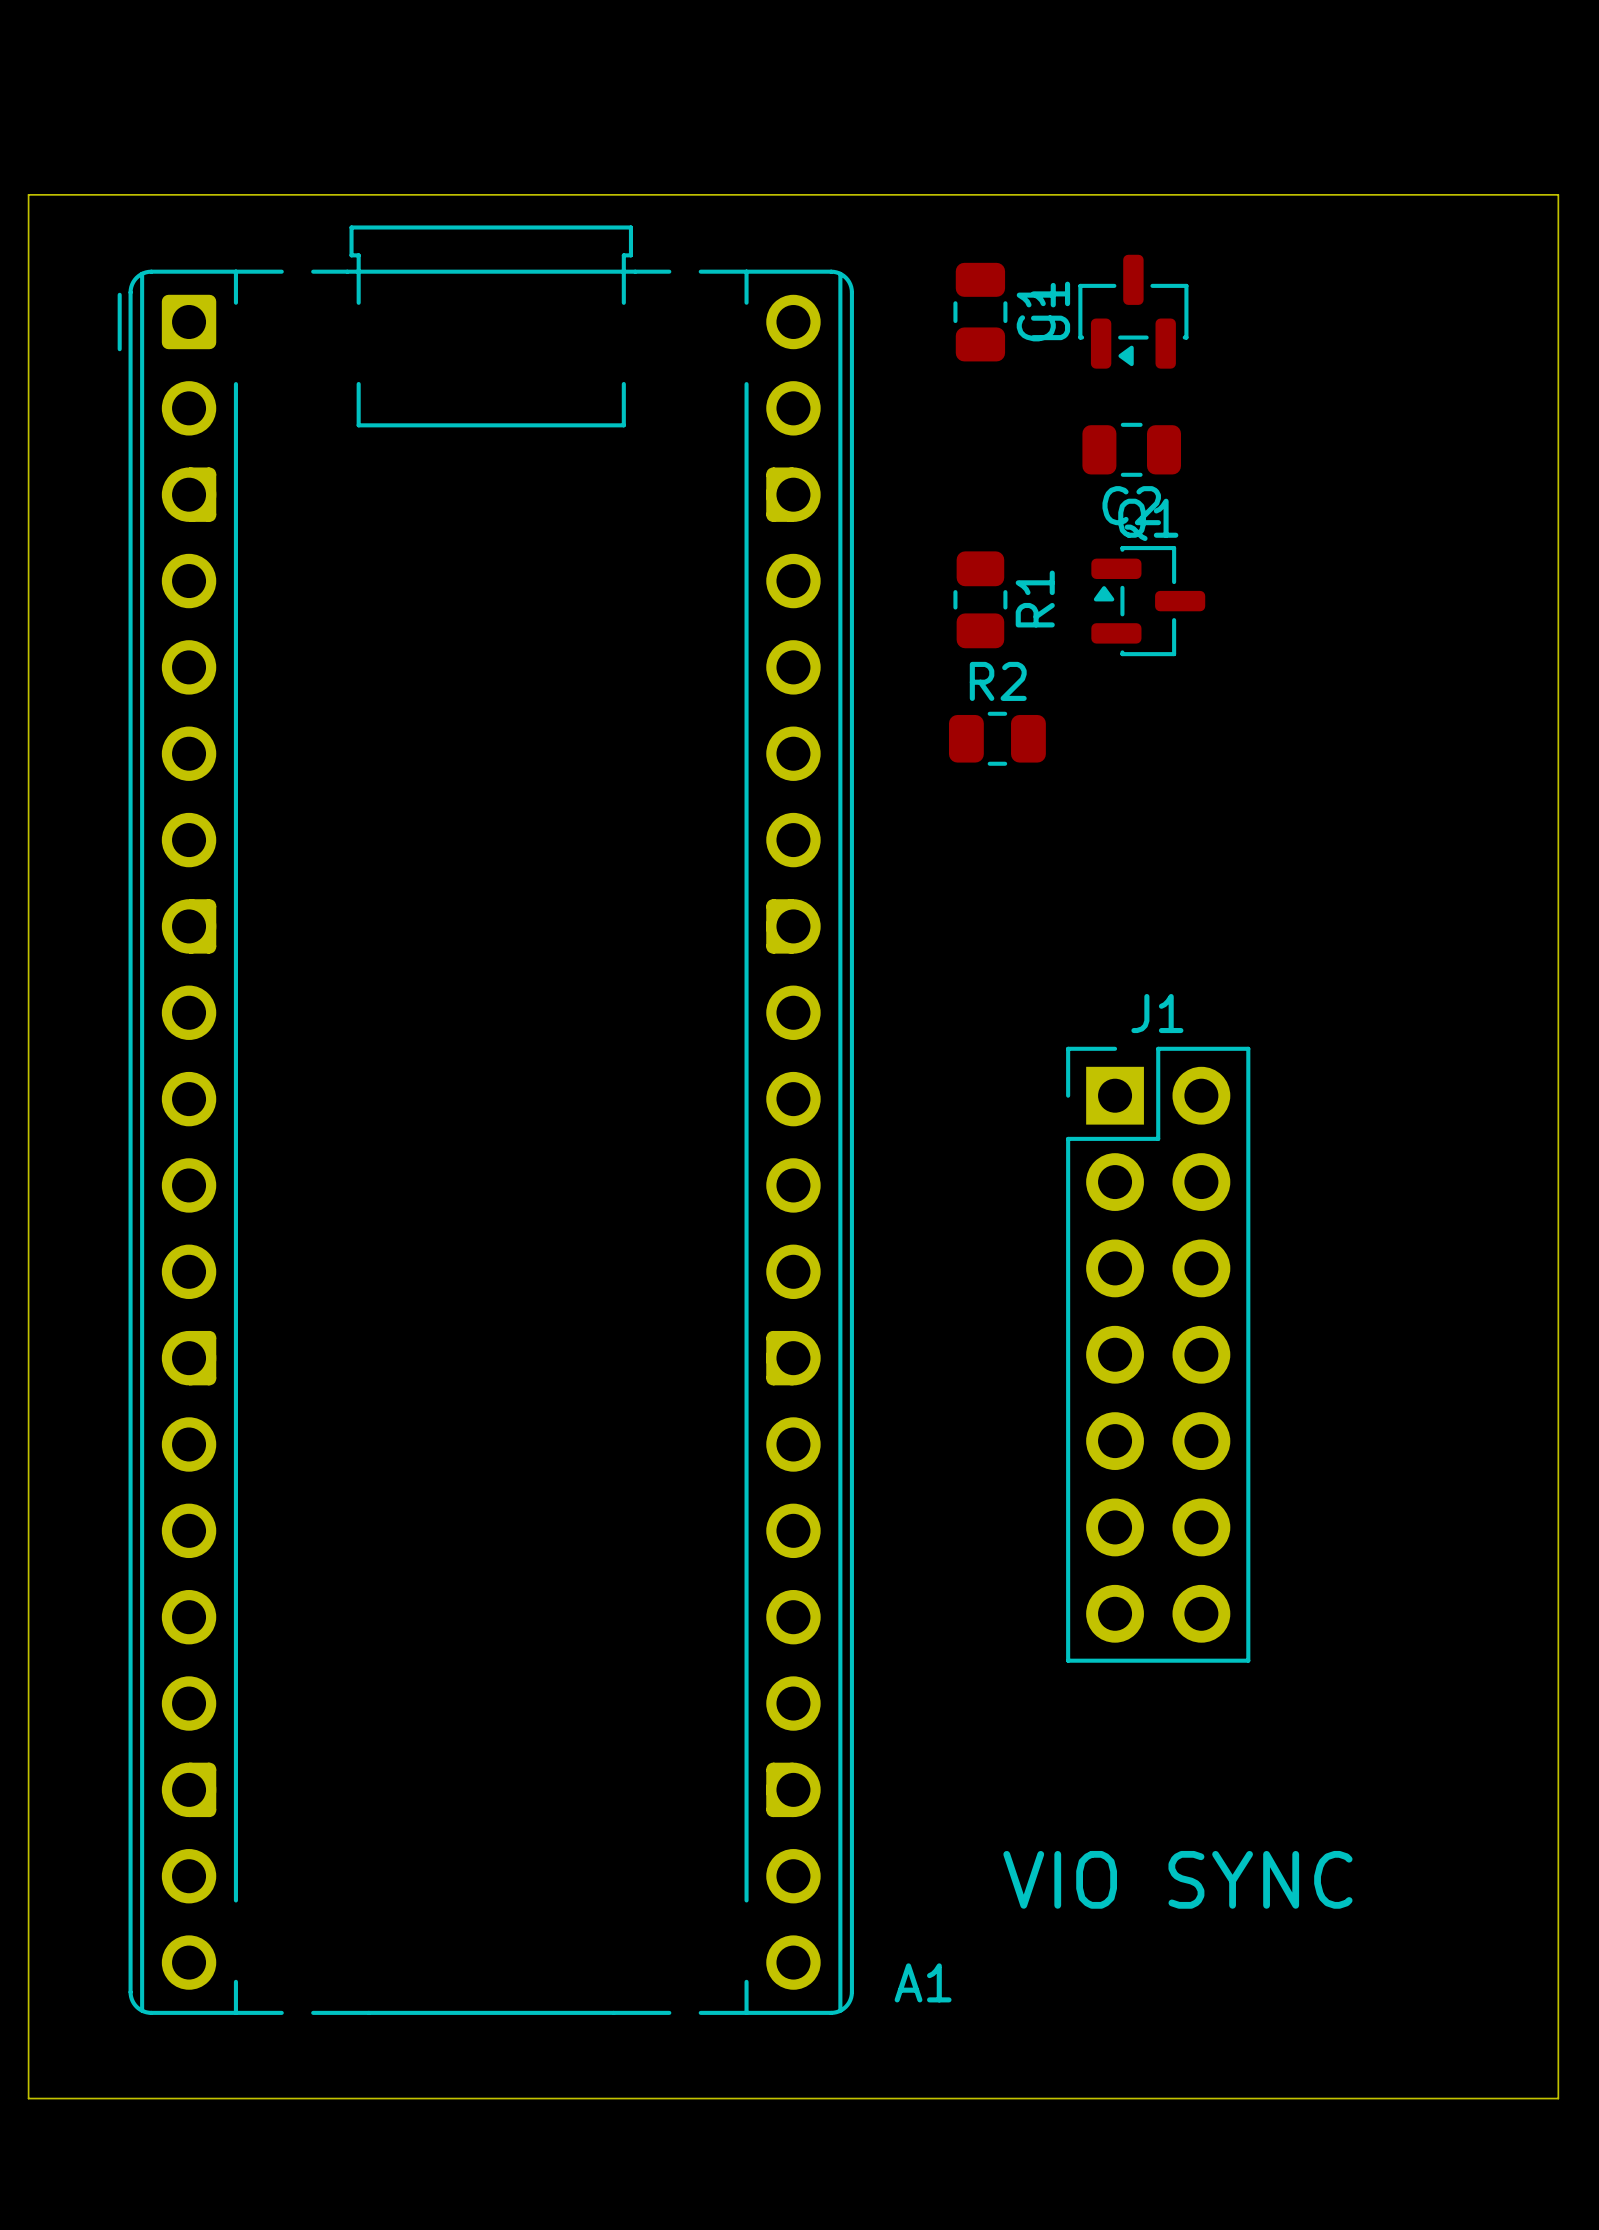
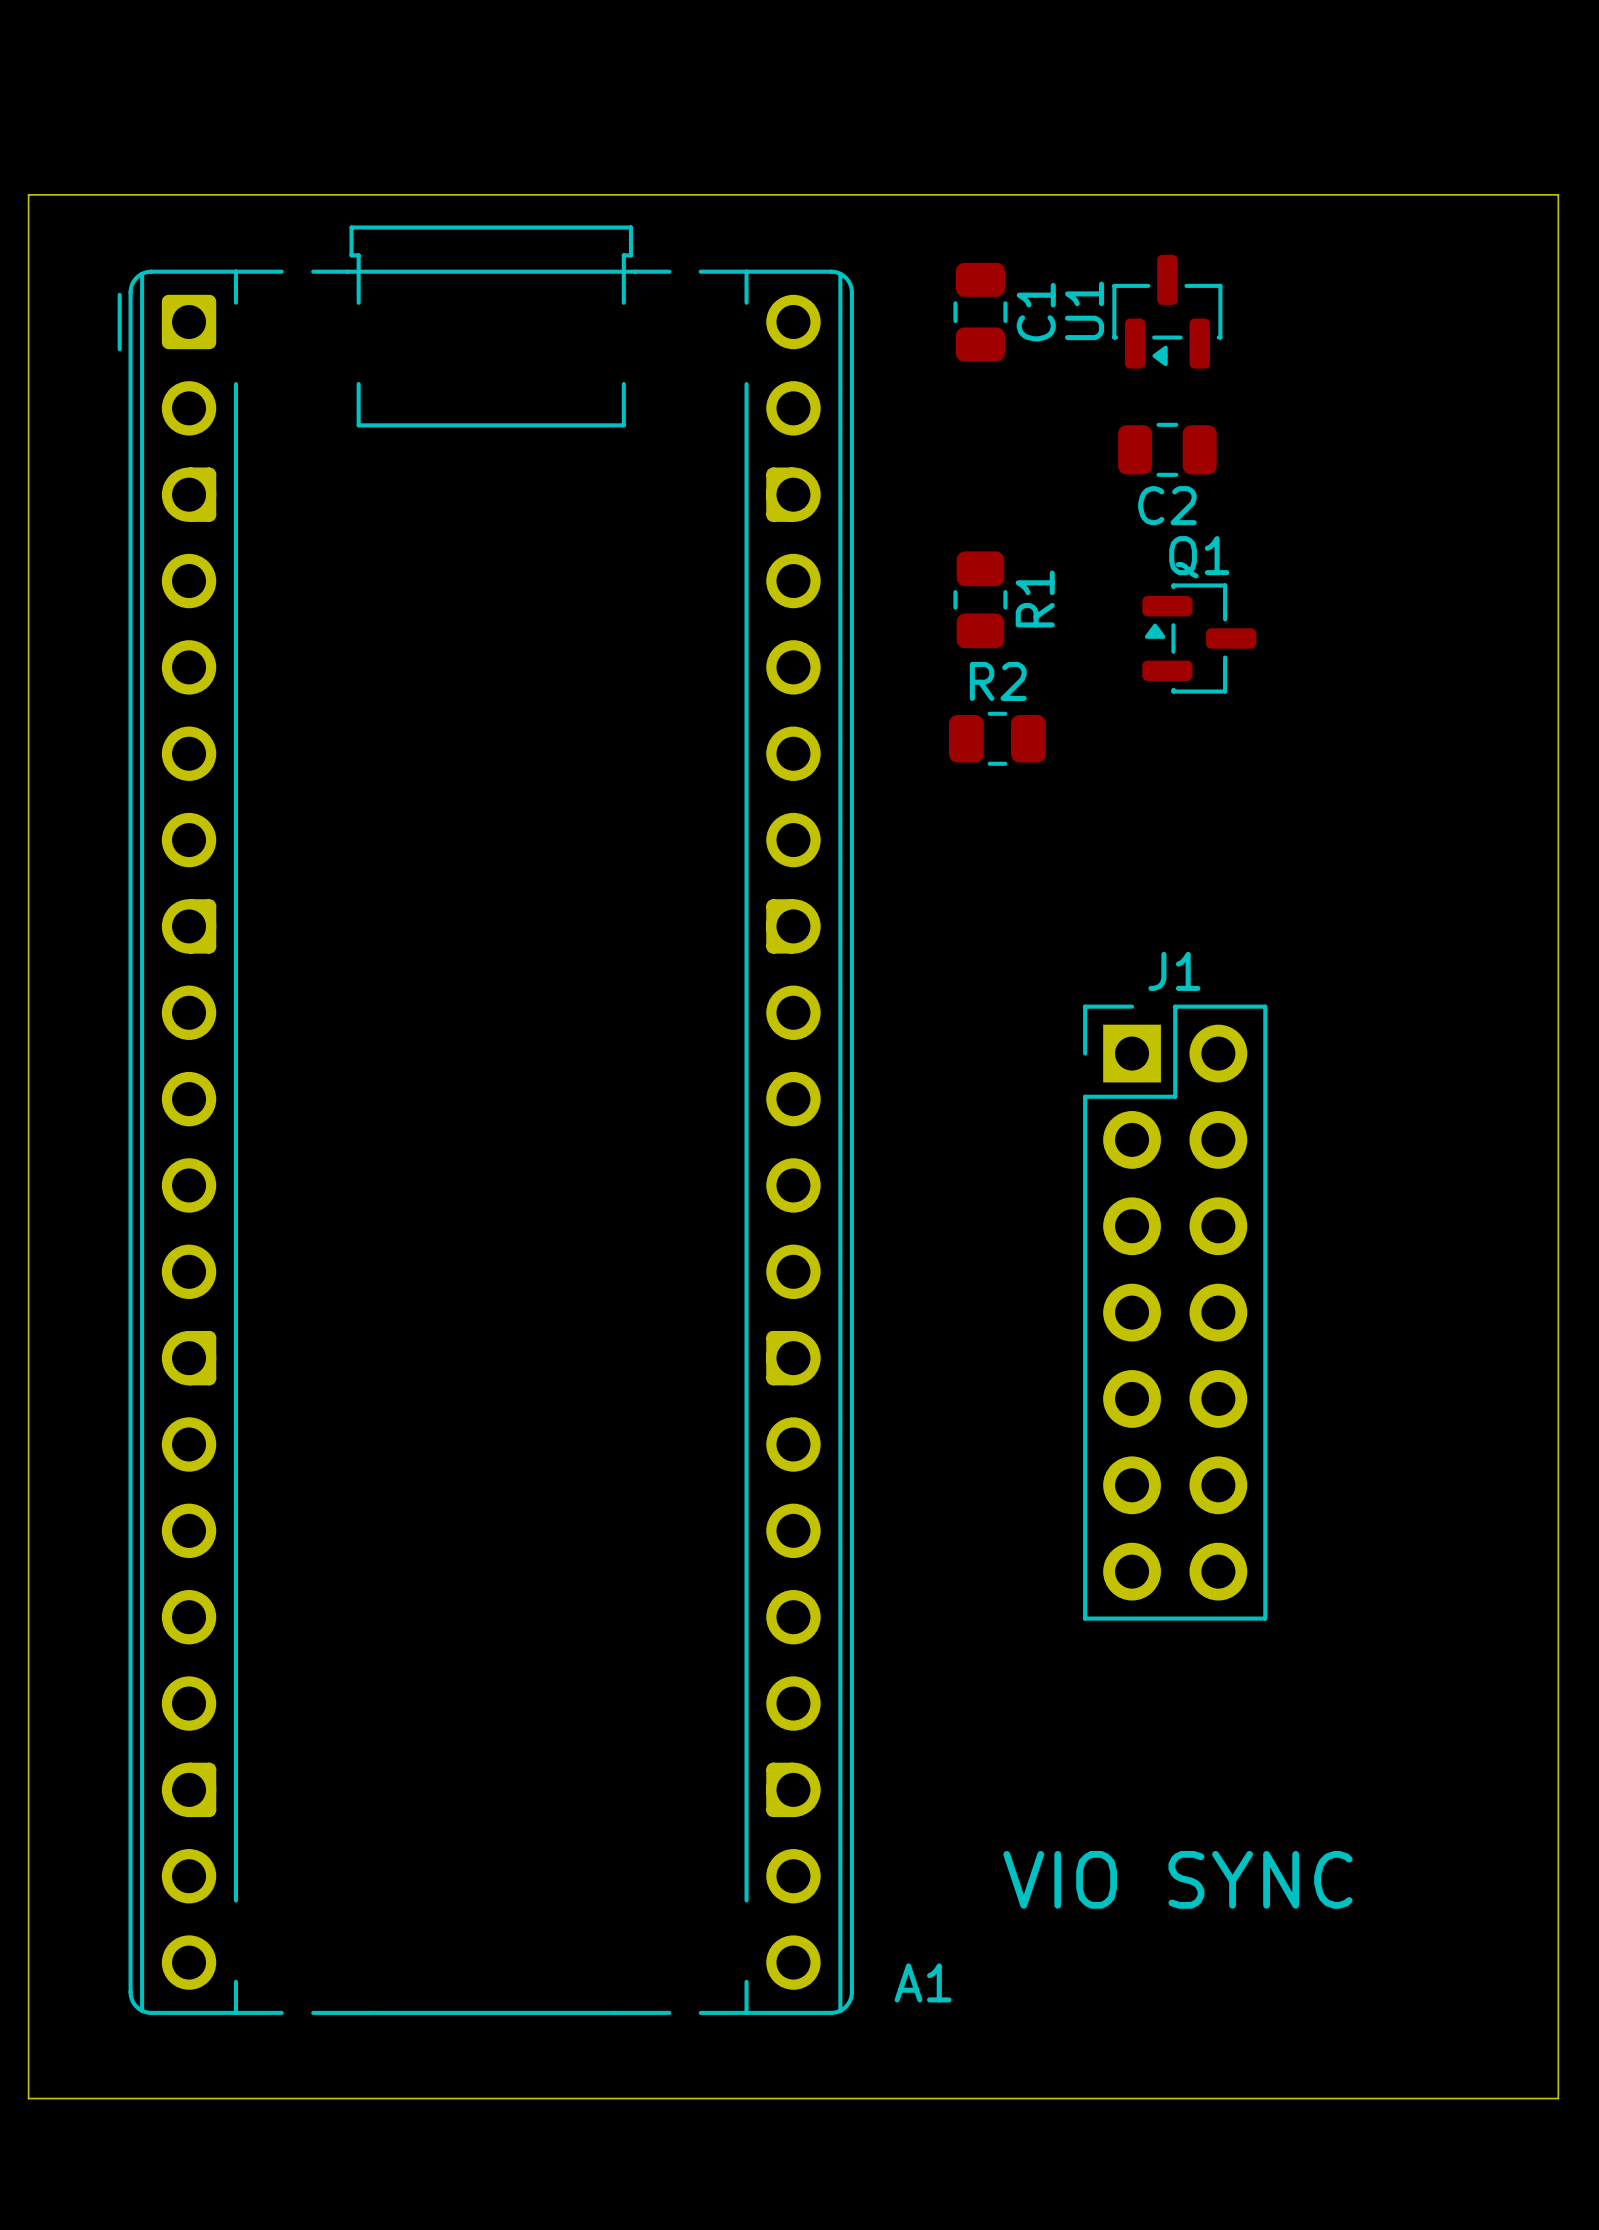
U1 position: (1133, 311) -> (1167, 311)
C2 position: (1131, 449) -> (1167, 449)
Q1 position: (1148, 601) -> (1199, 638)
J1 position: (1158, 1354) -> (1175, 1312)

